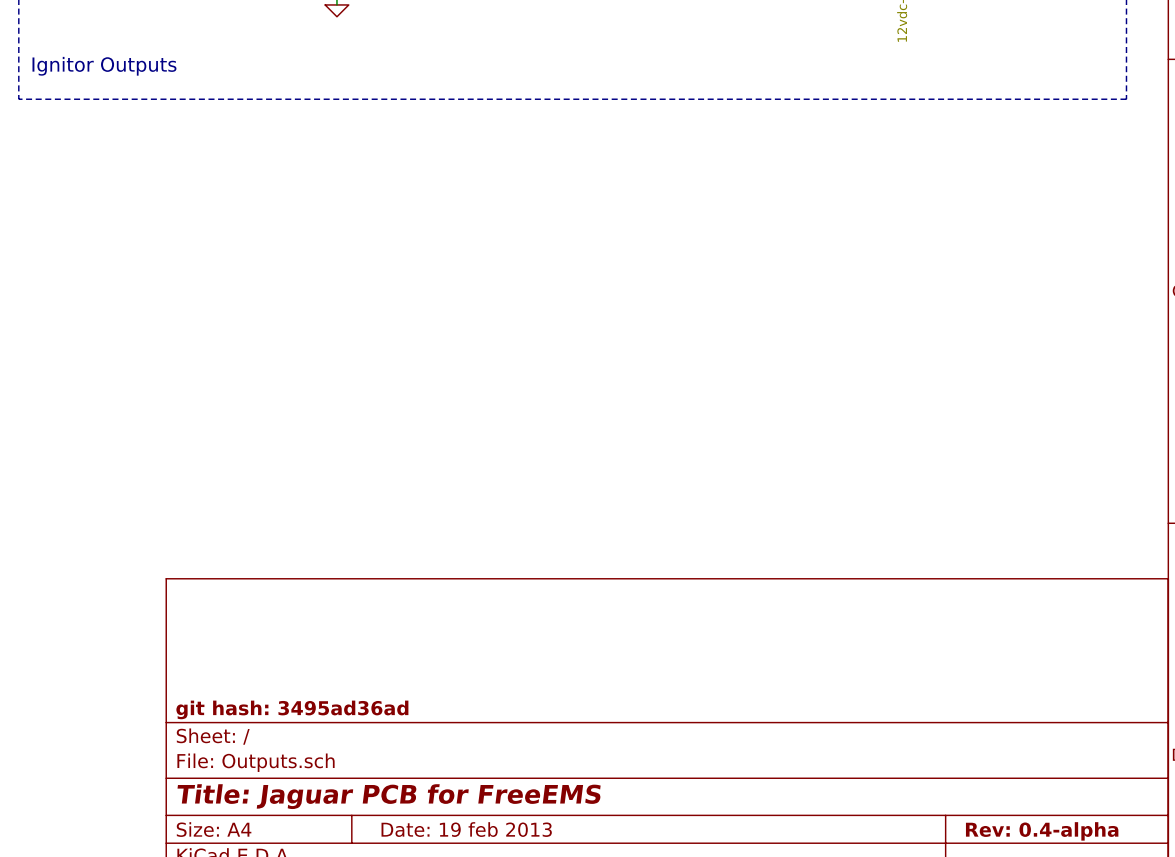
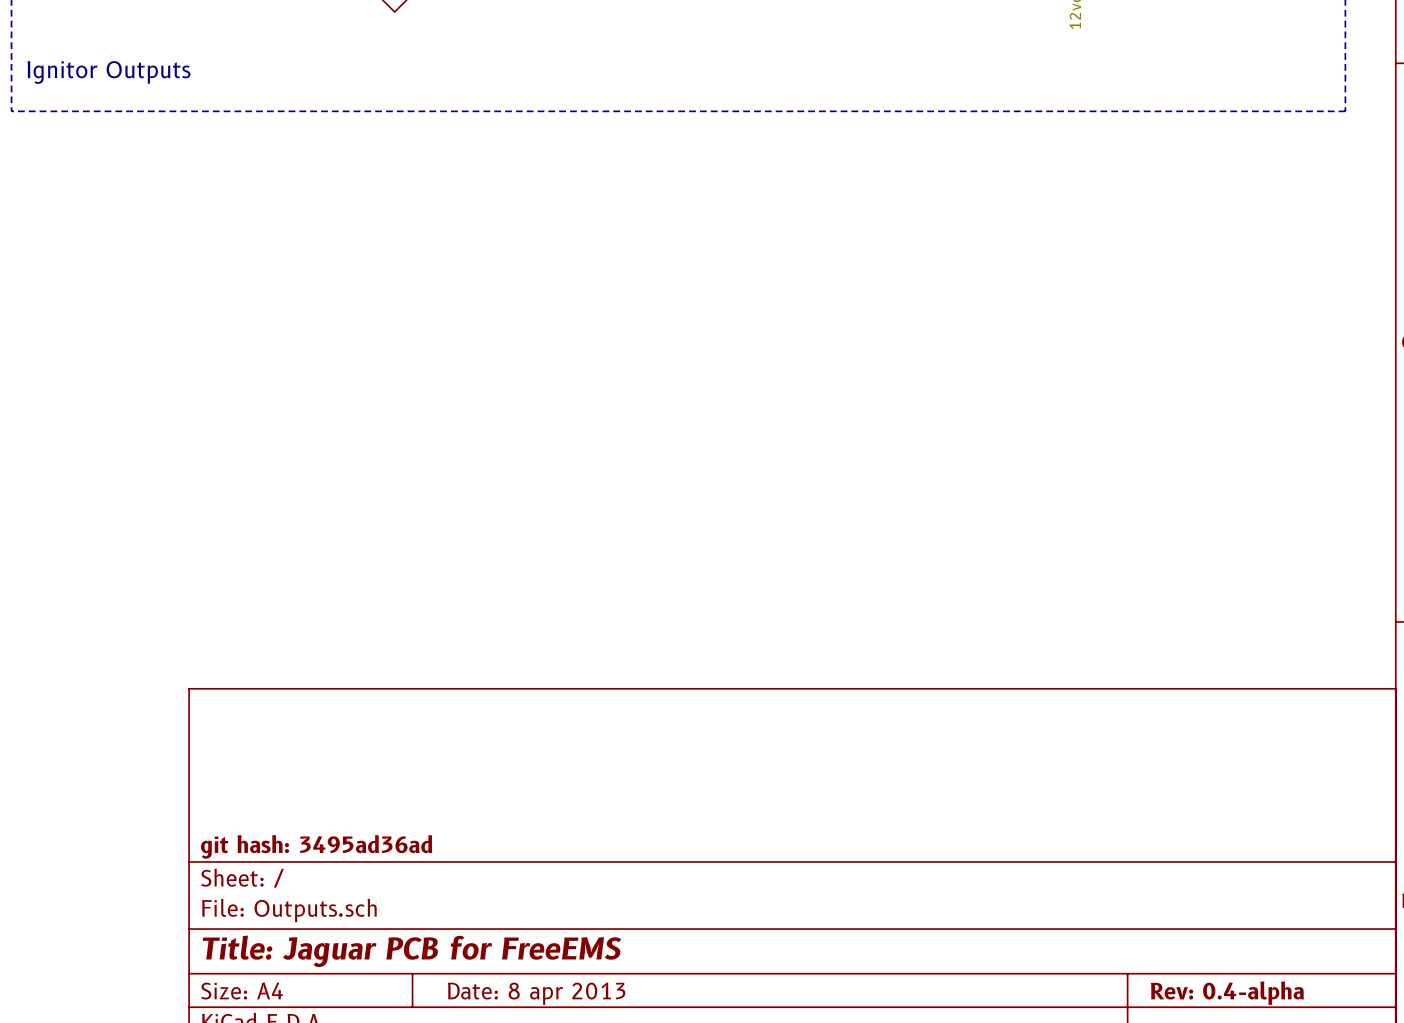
title block: Date: 19 feb 2013 (466, 829) -> Date: 8 apr 2013 (536, 993)

